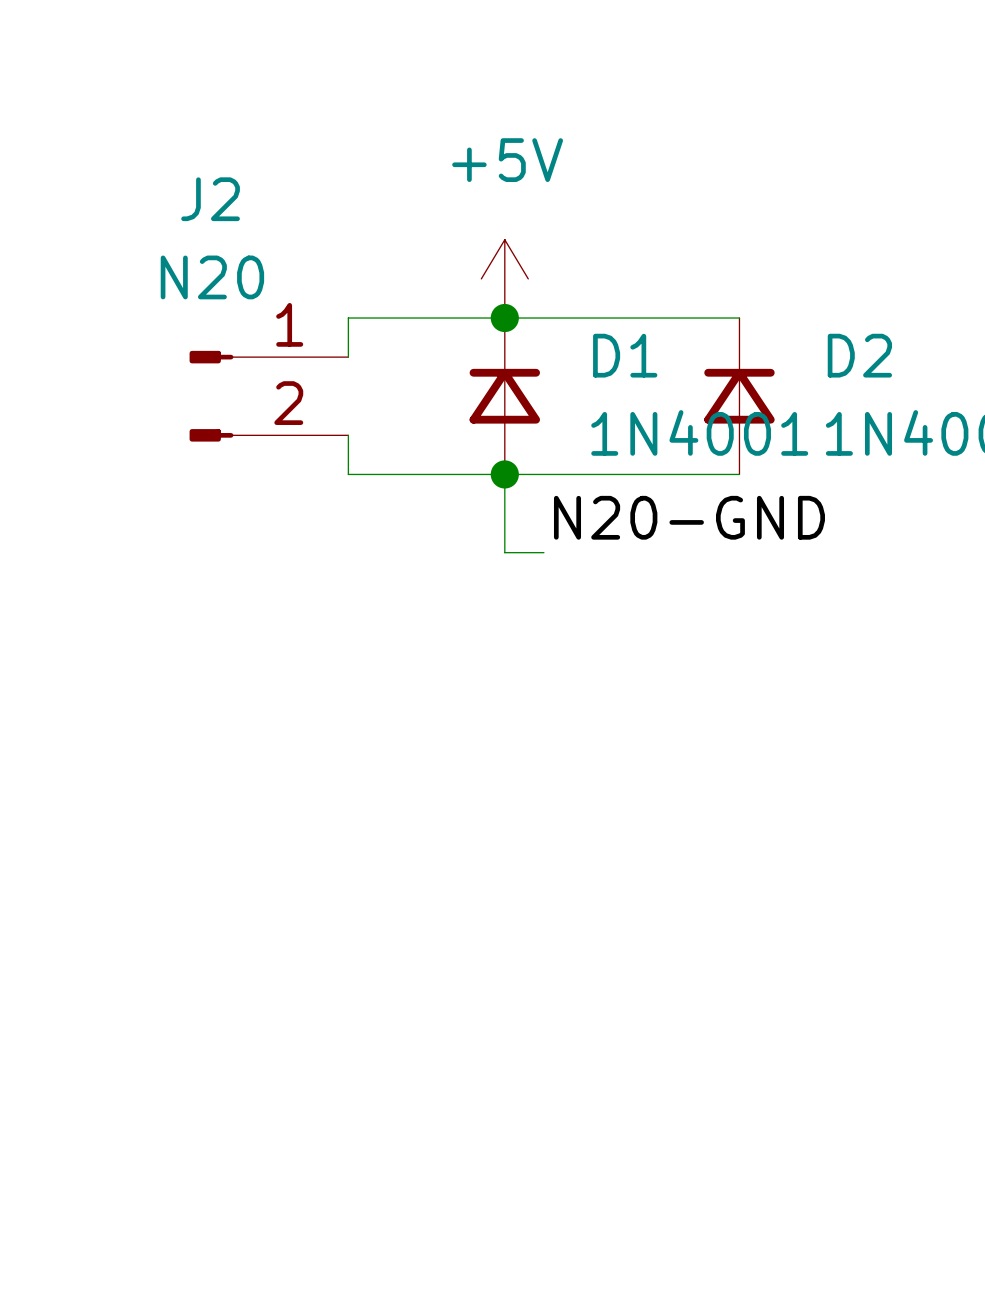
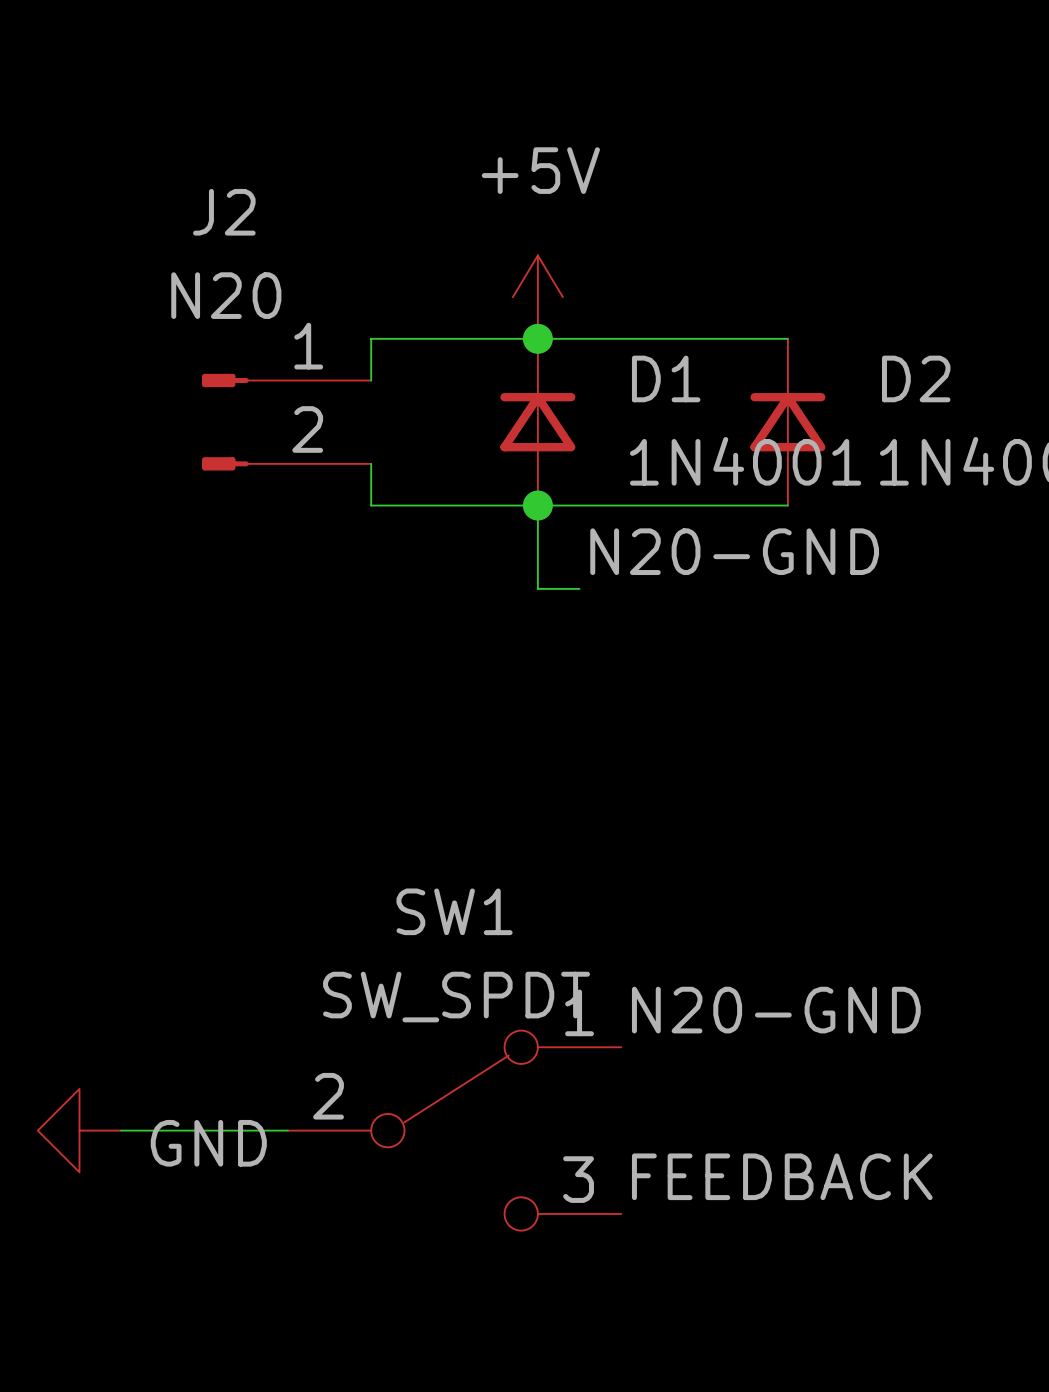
label: none -> N20-GND (776, 1010)
power symbol: none -> GND (79, 1130)
wire: none -> (121, 1130) (287, 1130)
SW1: none -> SW_SPDT (454, 1130)
label: none -> FEEDBACK (782, 1176)

